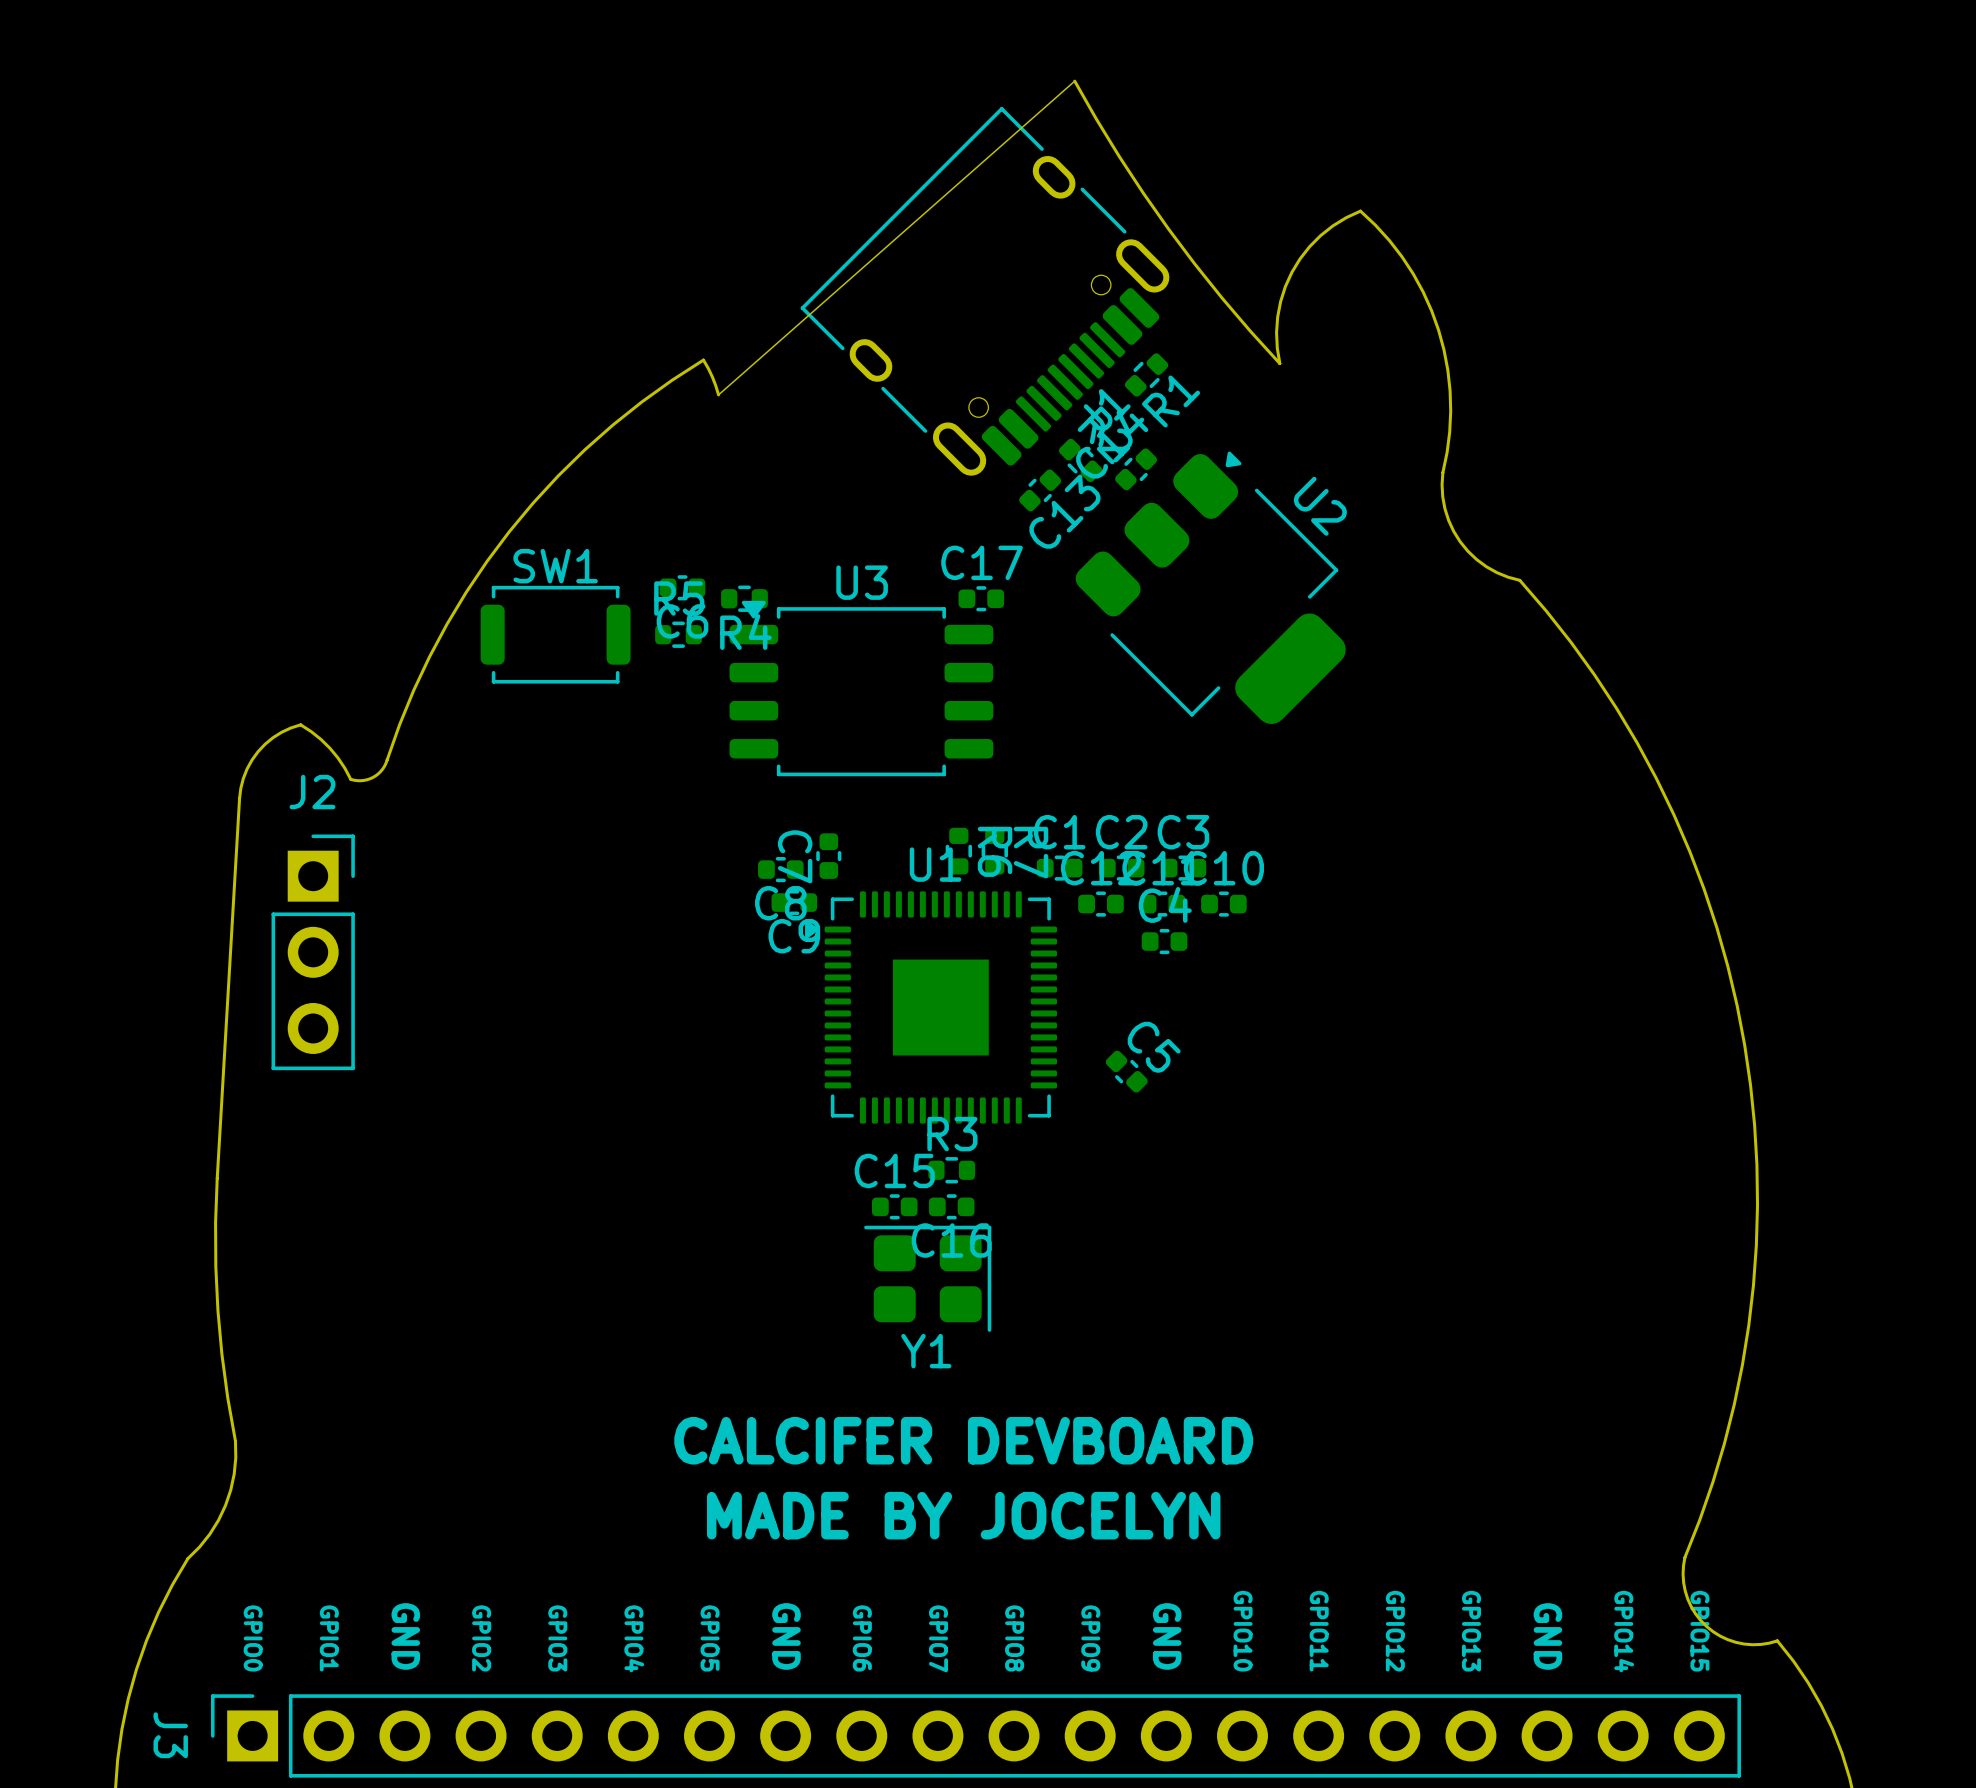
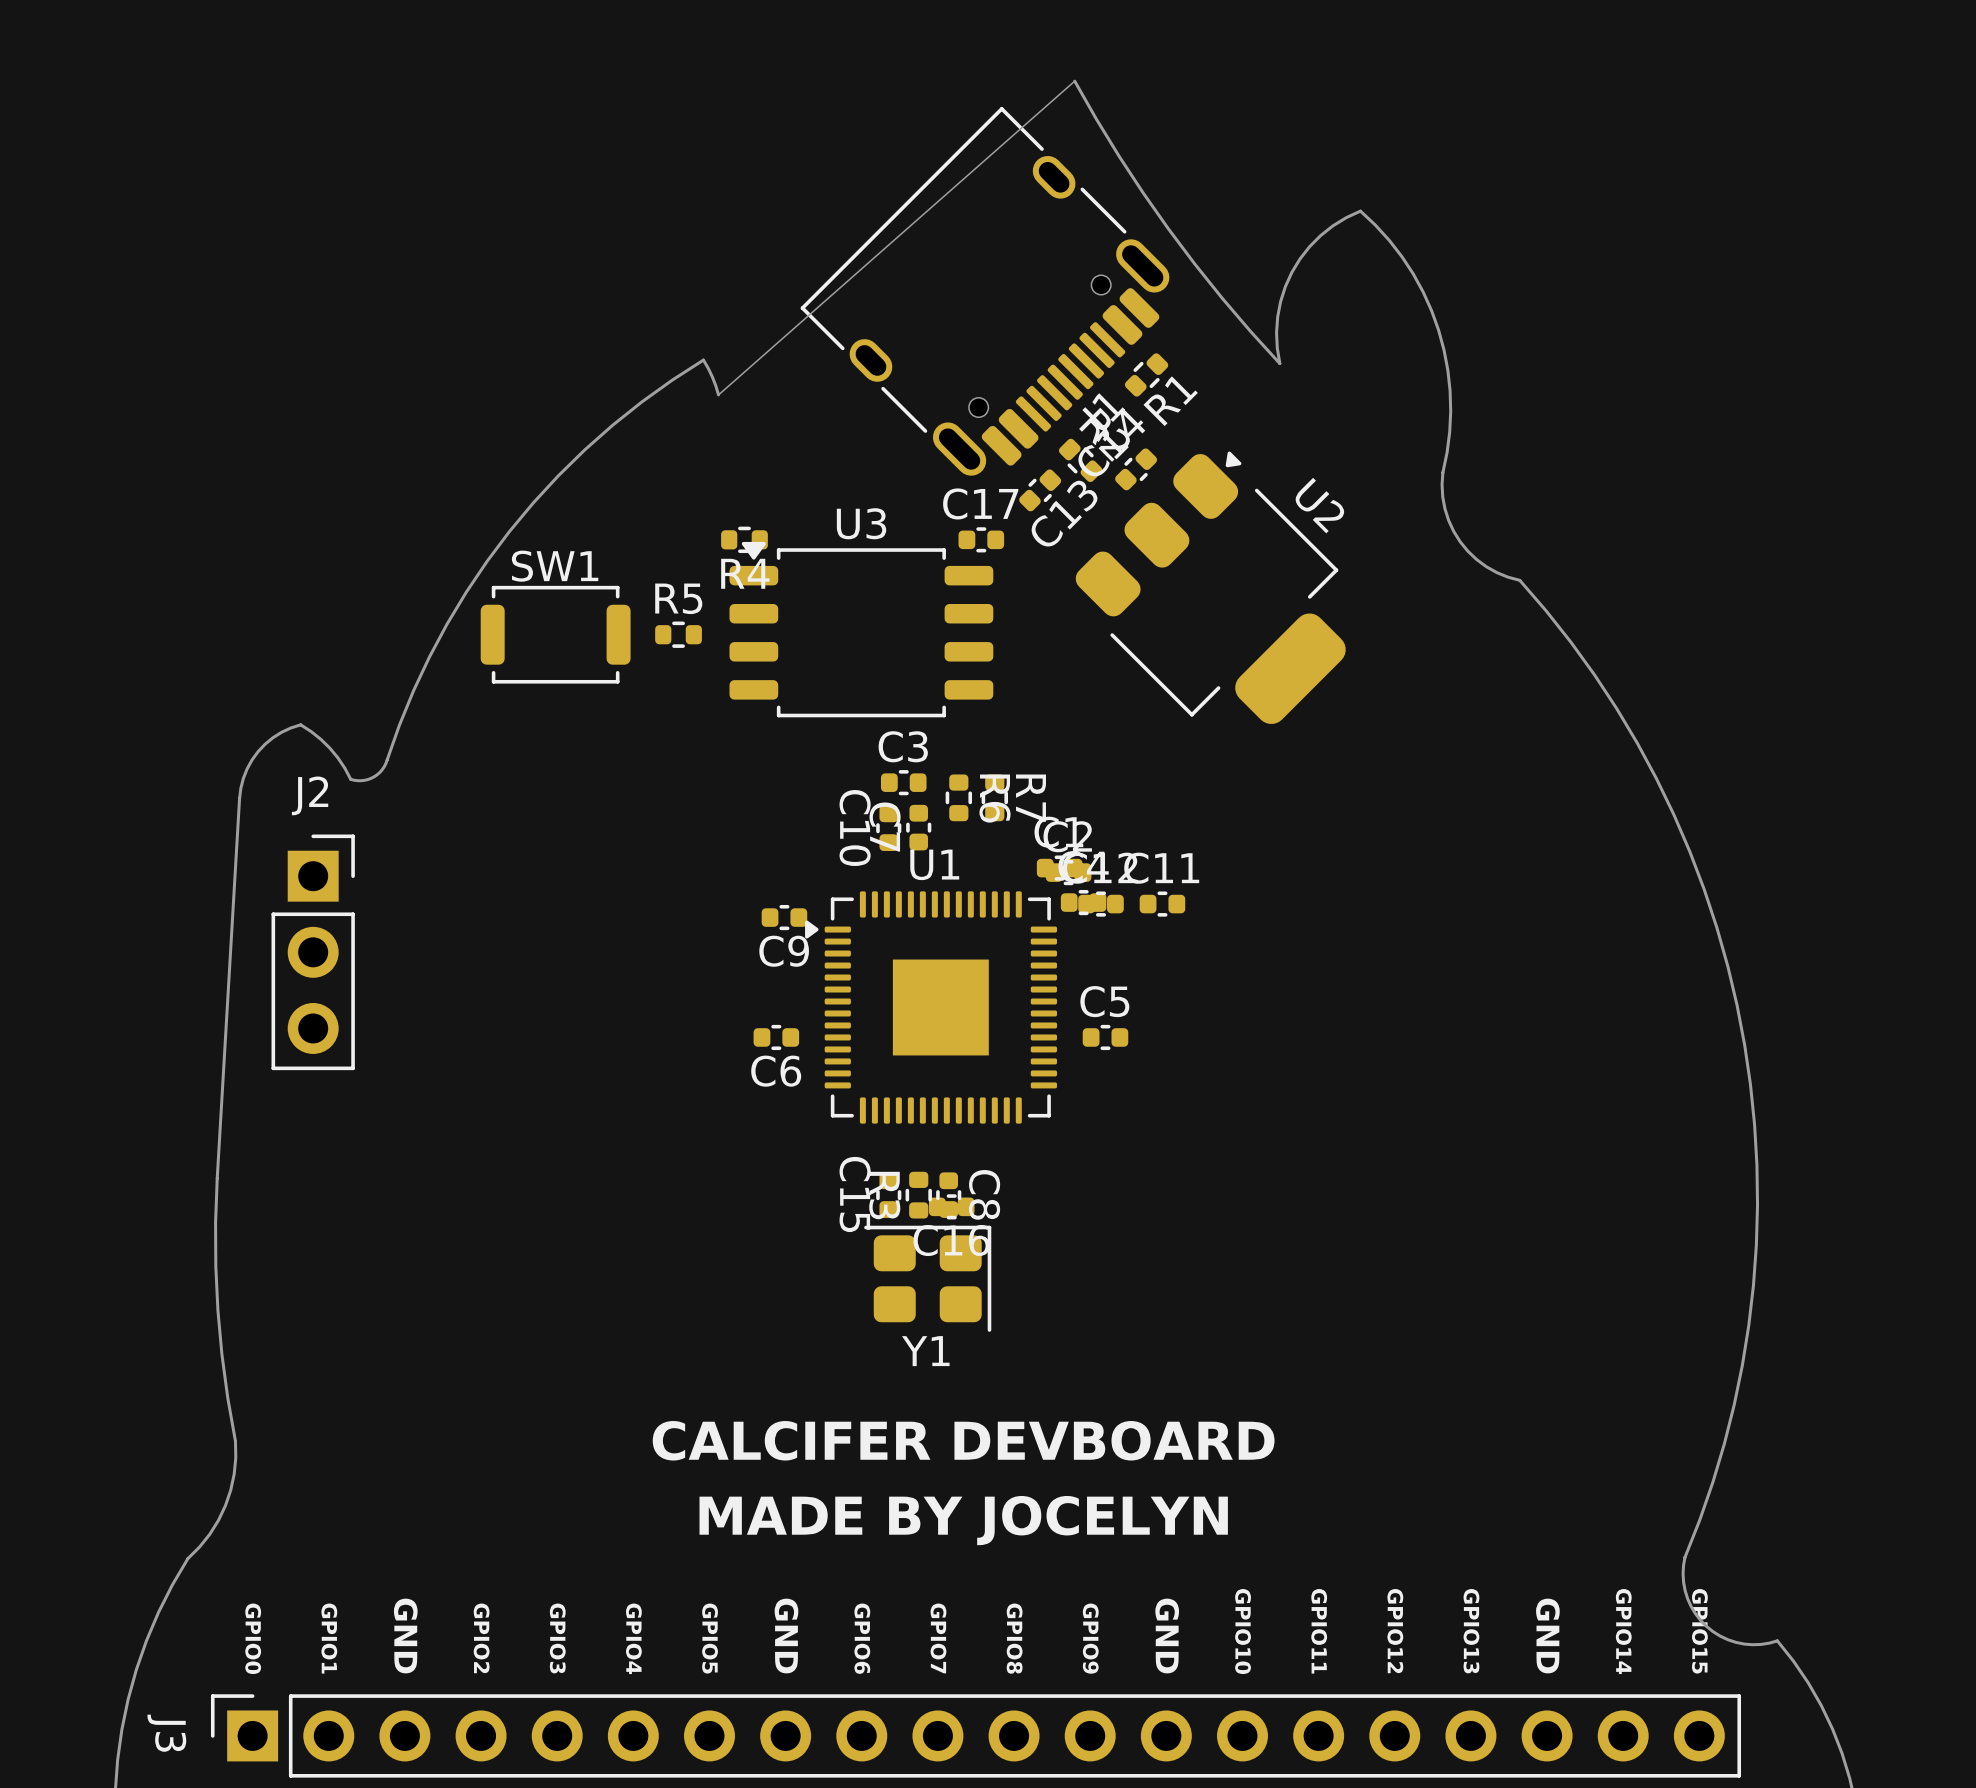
C6 position: (682, 587) -> (776, 1037)
R4 position: (744, 598) -> (744, 539)
C17 position: (981, 598) -> (981, 539)
U3 position: (861, 688) -> (861, 629)
R6 position: (958, 851) -> (958, 797)
R7 position: (994, 851) -> (994, 797)
C7 position: (828, 856) -> (918, 827)
C2 position: (1121, 868) -> (1068, 872)
C3 position: (1183, 868) -> (903, 782)
C8 rotation: 0° (780, 869) -> 90° clockwise (948, 1195)
C8 position: (780, 869) -> (948, 1195)
C9 position: (794, 902) -> (784, 917)
C10 rotation: 0° (1223, 904) -> 90° clockwise (888, 828)
C10 position: (1223, 904) -> (888, 828)
C4 position: (1164, 941) -> (1083, 902)
C5 rotation: 0° (1126, 1071) -> 45° counterclockwise (1105, 1037)
C5 position: (1126, 1071) -> (1105, 1037)
R3 rotation: 0° (951, 1170) -> 90° clockwise (918, 1195)
R3 position: (951, 1170) -> (918, 1195)
C15 rotation: 0° (894, 1206) -> 90° clockwise (888, 1195)

